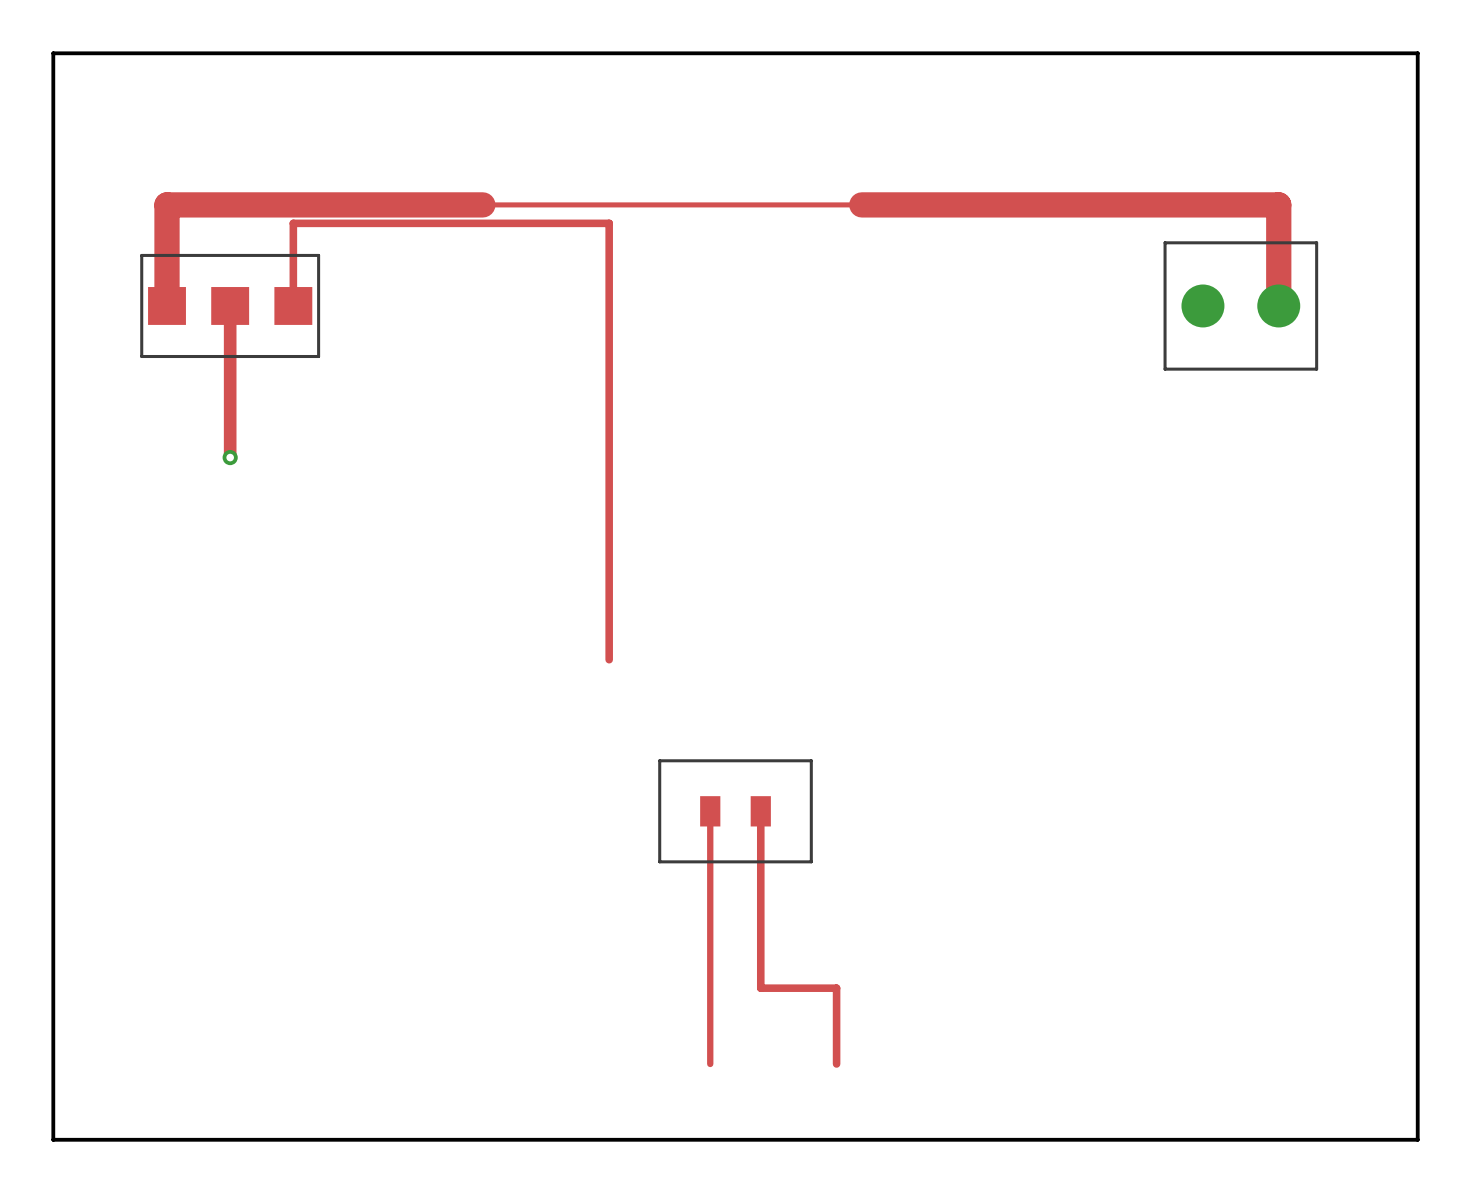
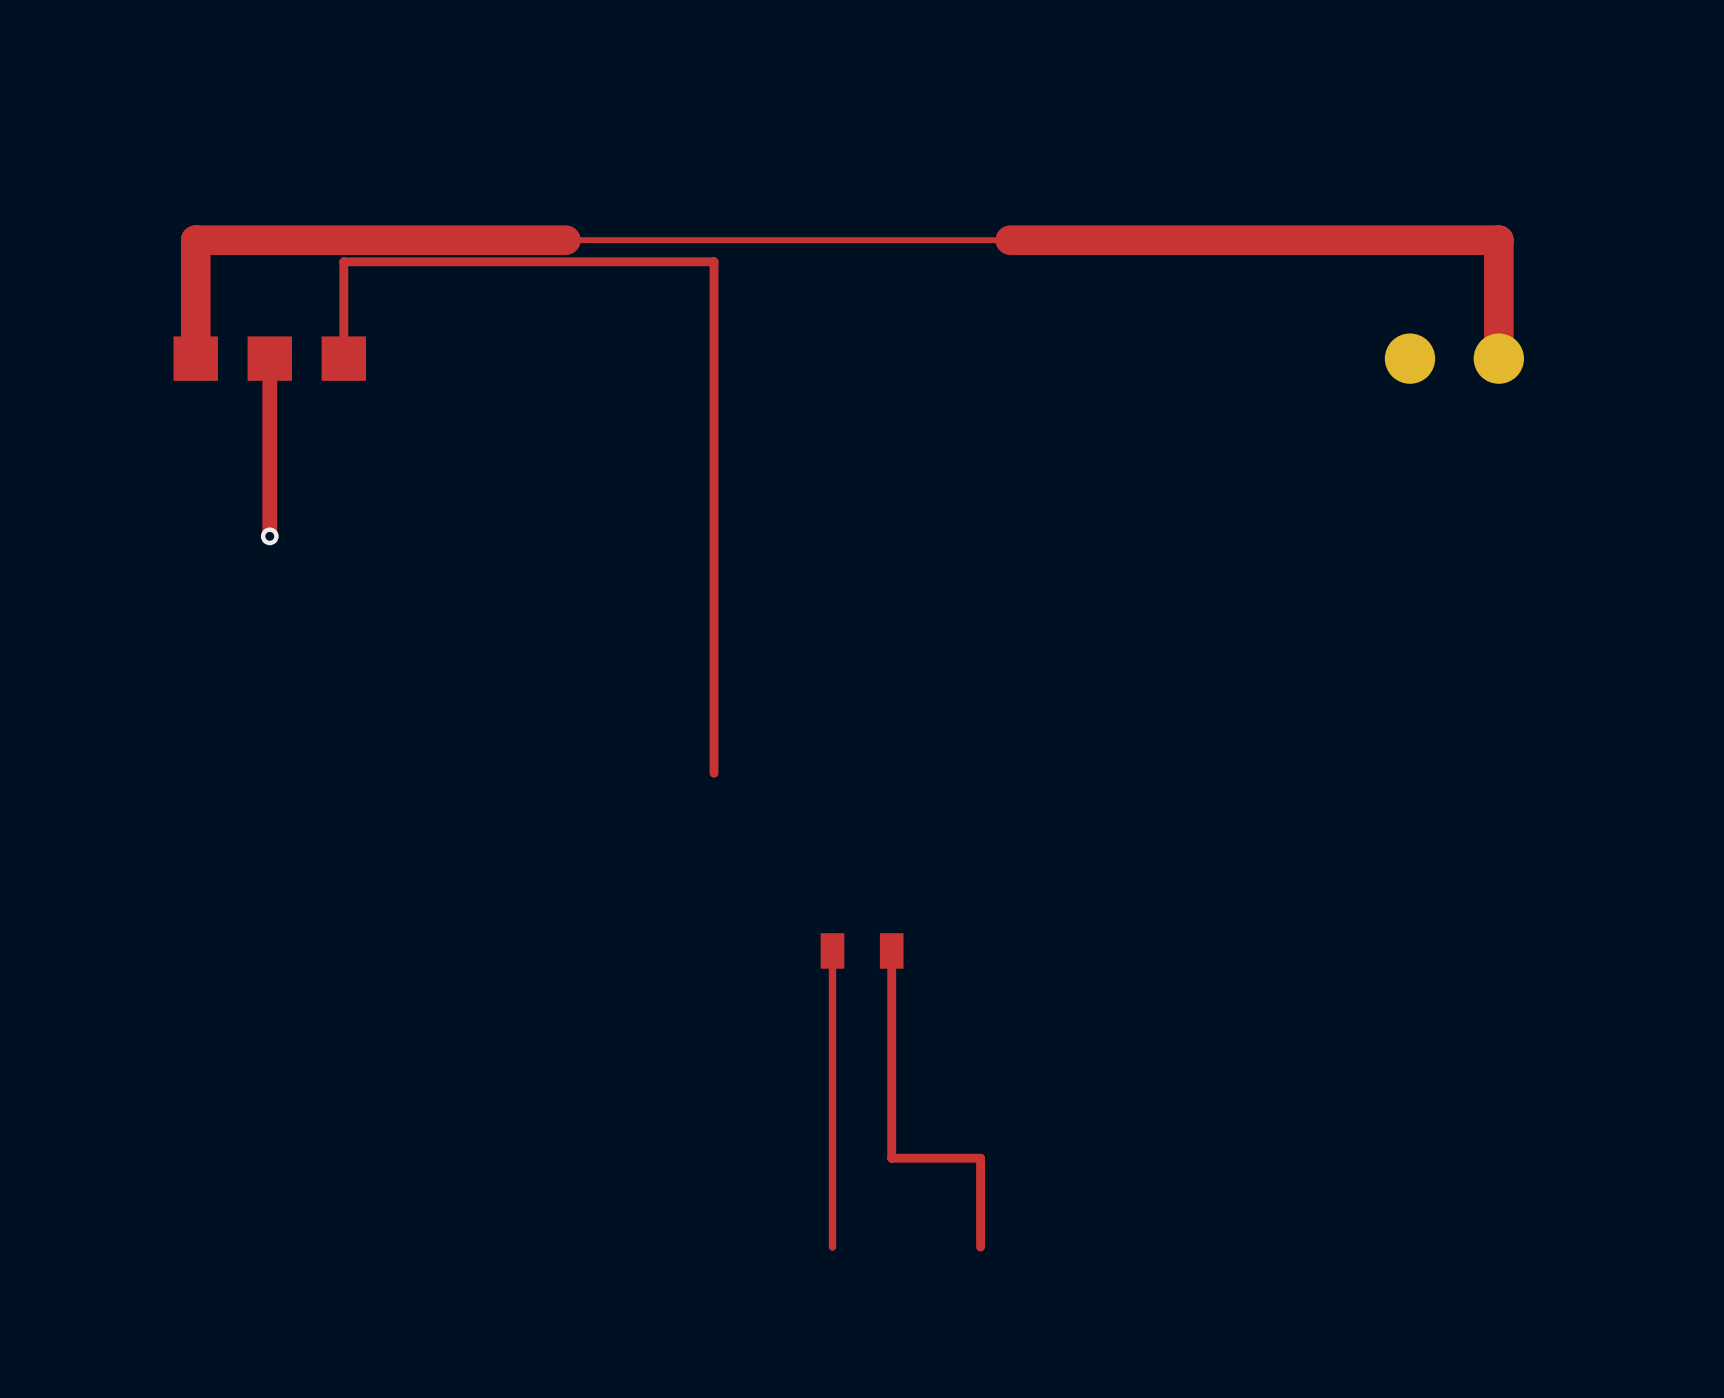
board edge: (53, 53) (1417, 53) (1417, 1139) (53, 1139) (53, 53) -> none
part footprint: [1163, 241, 1319, 371] -> [1384, 333, 1525, 384]
part footprint: [140, 253, 321, 359] -> [173, 336, 367, 381]
part footprint: [658, 759, 813, 864] -> [820, 933, 904, 969]

